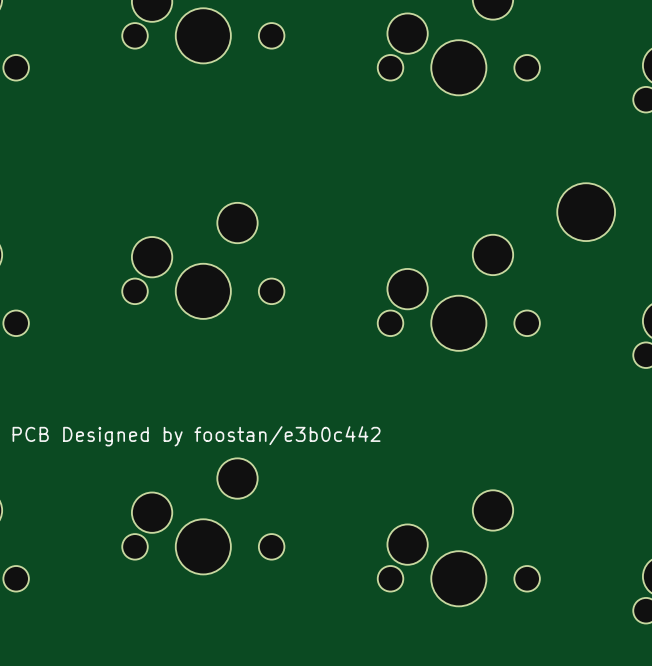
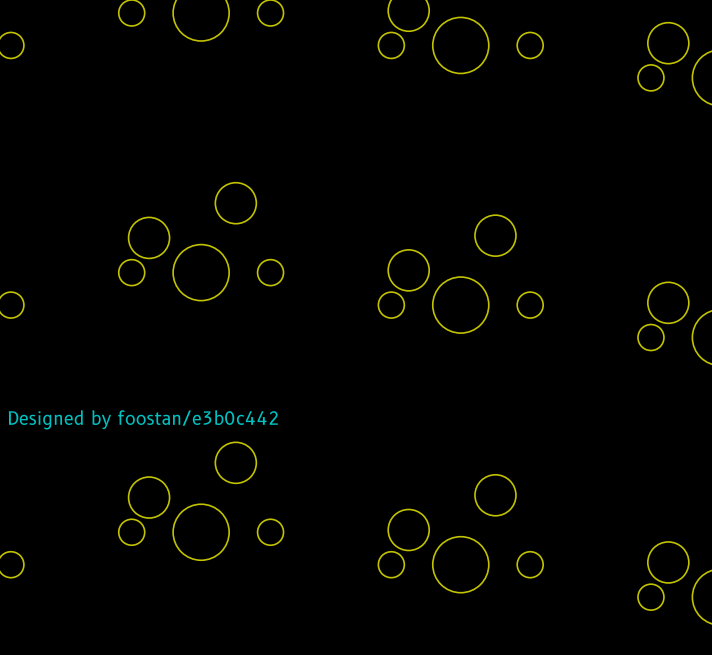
part: (586, 212) -> none

